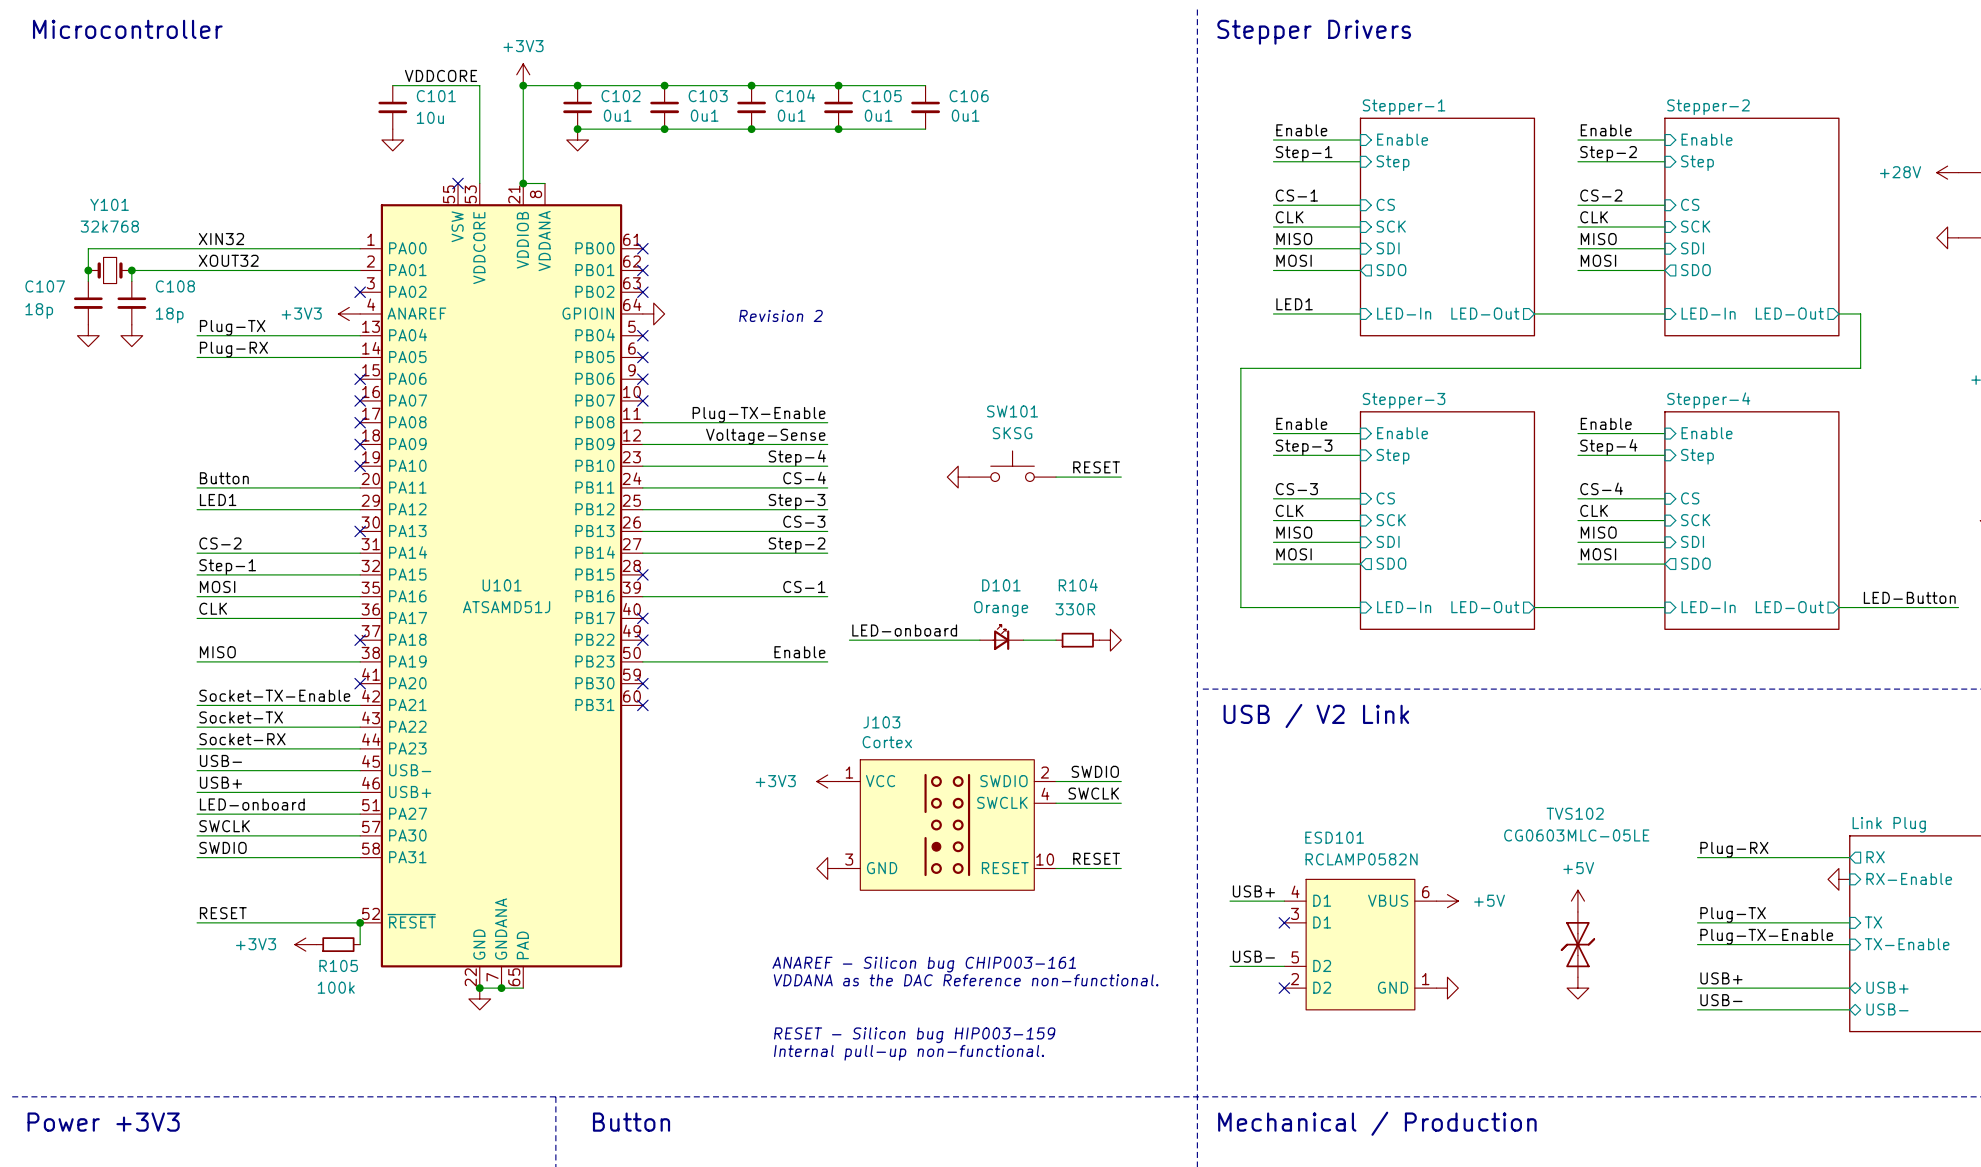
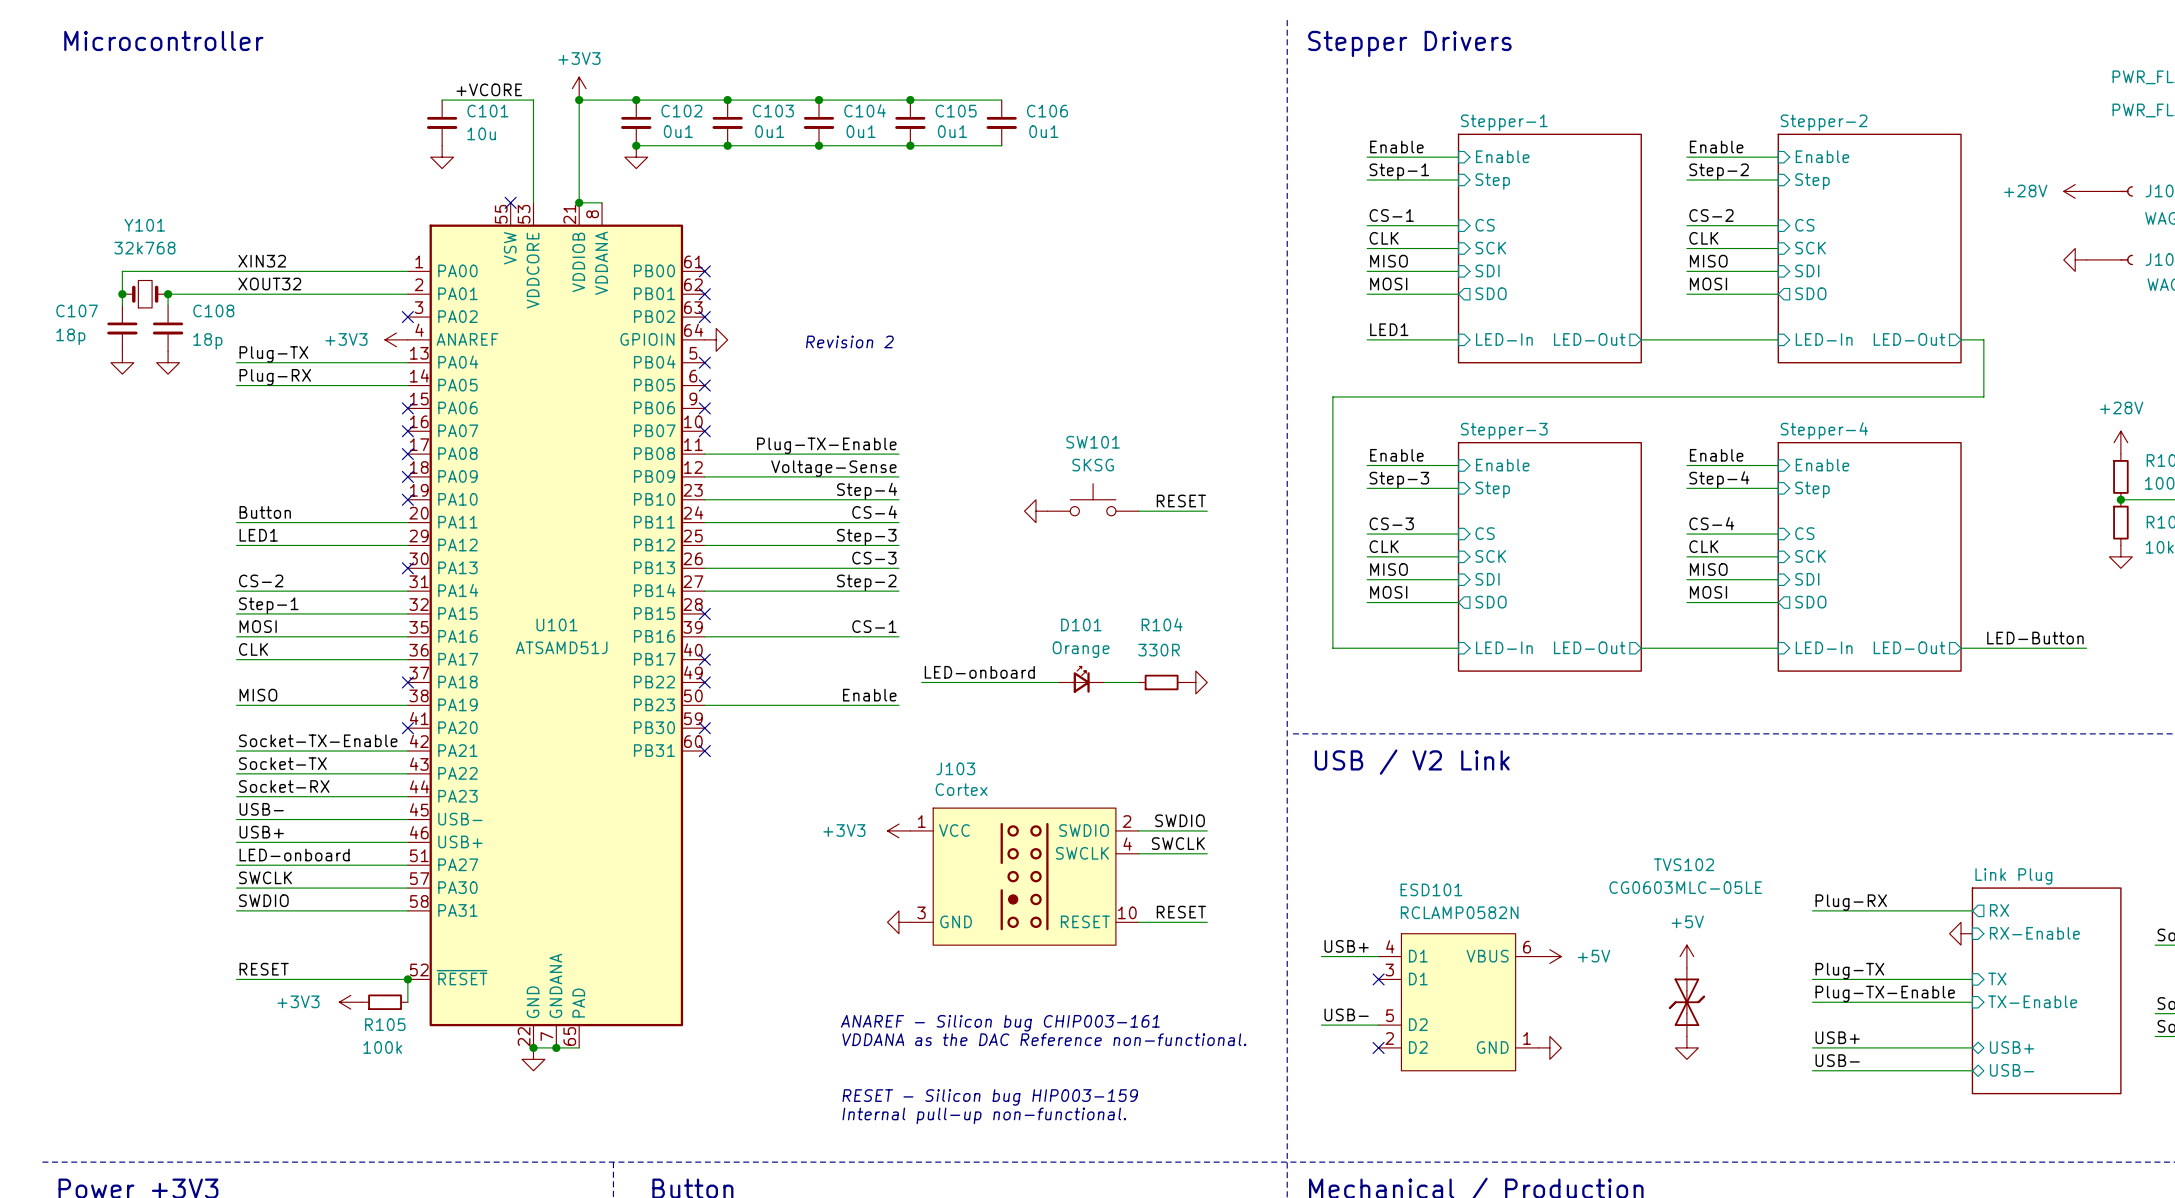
label: VDDCORE (441, 75) -> +VCORE (489, 89)

